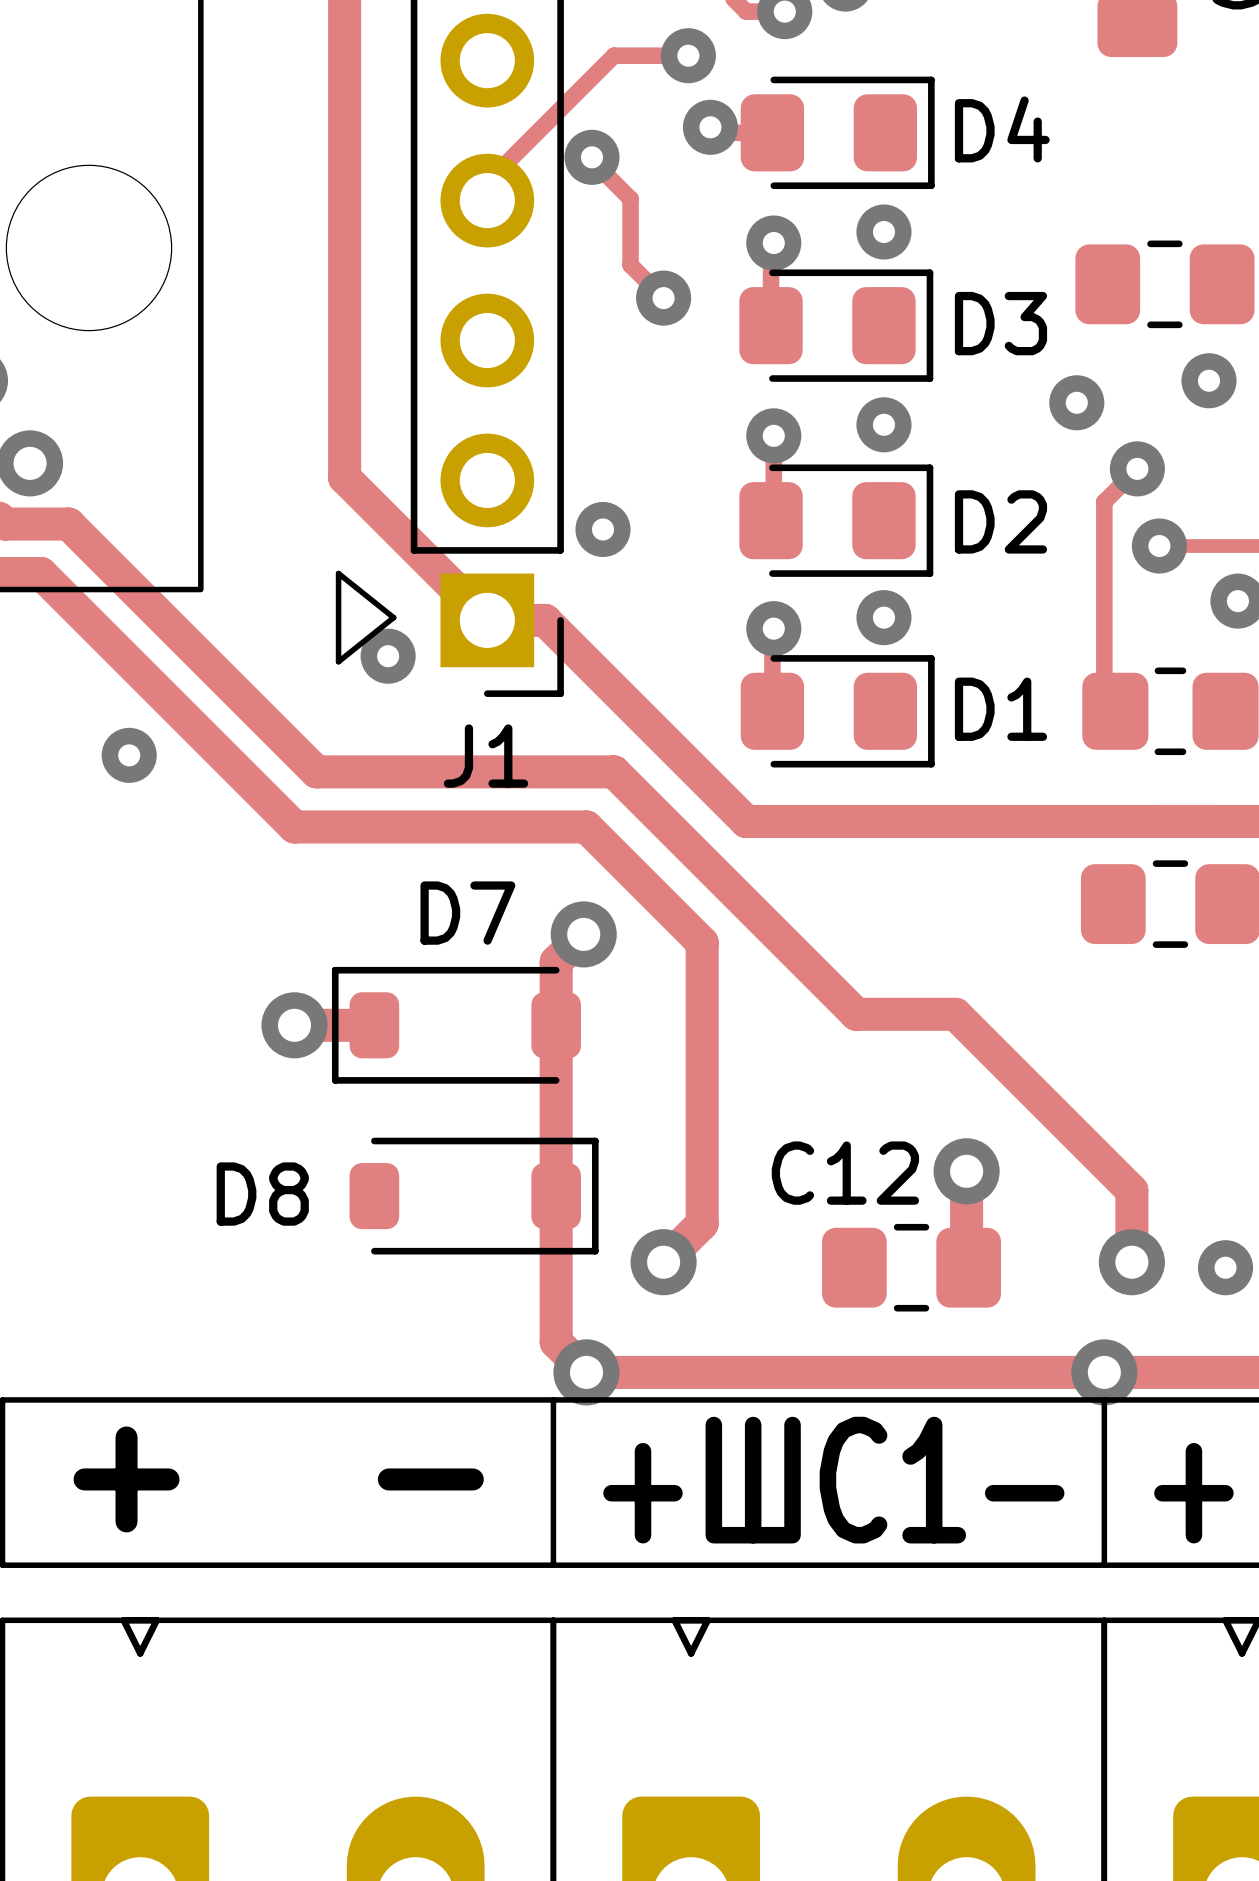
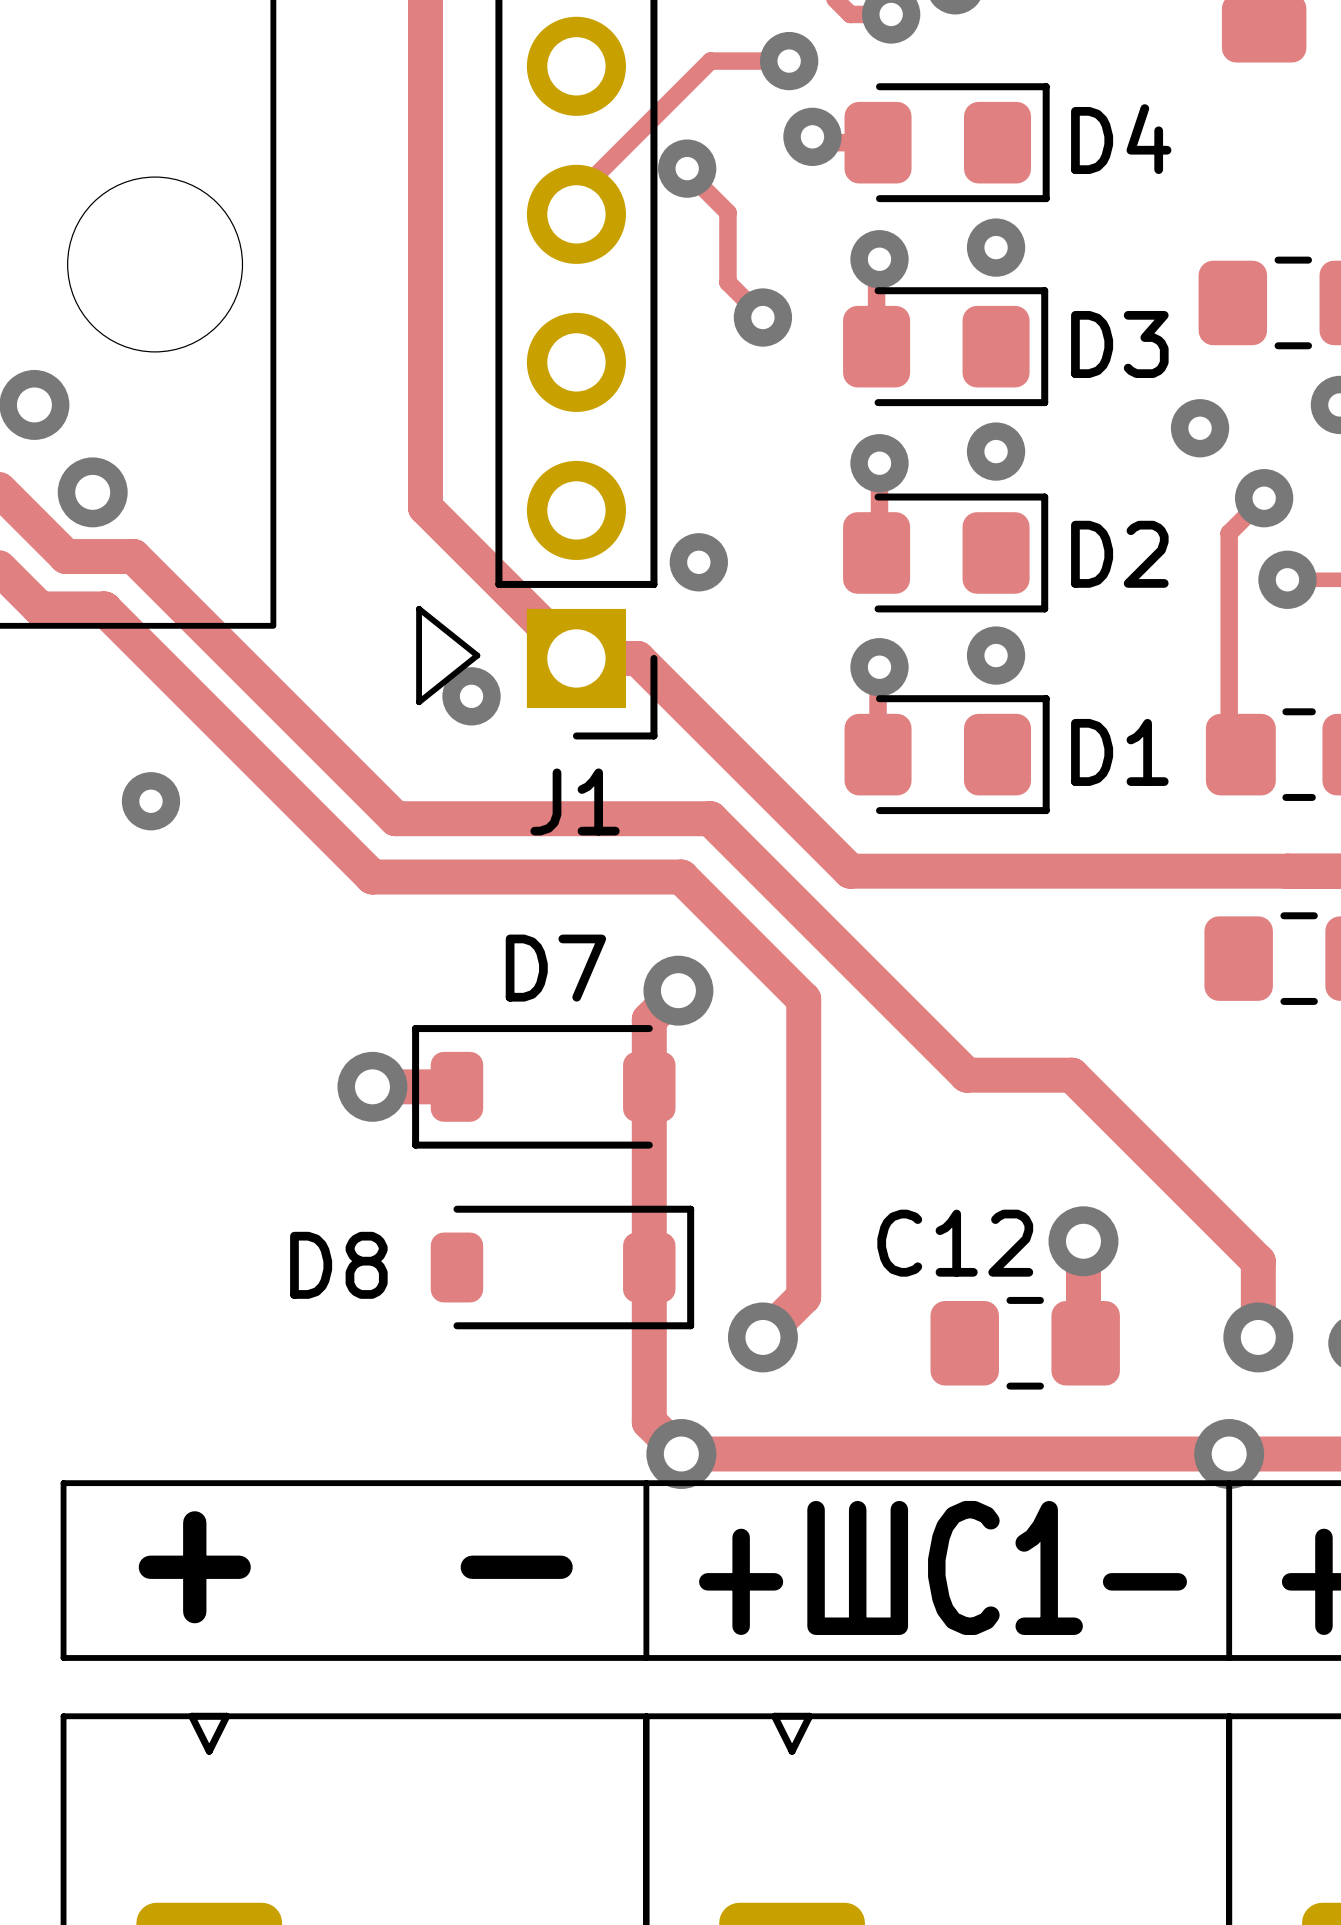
via position: (129, 755) -> (150, 801)

